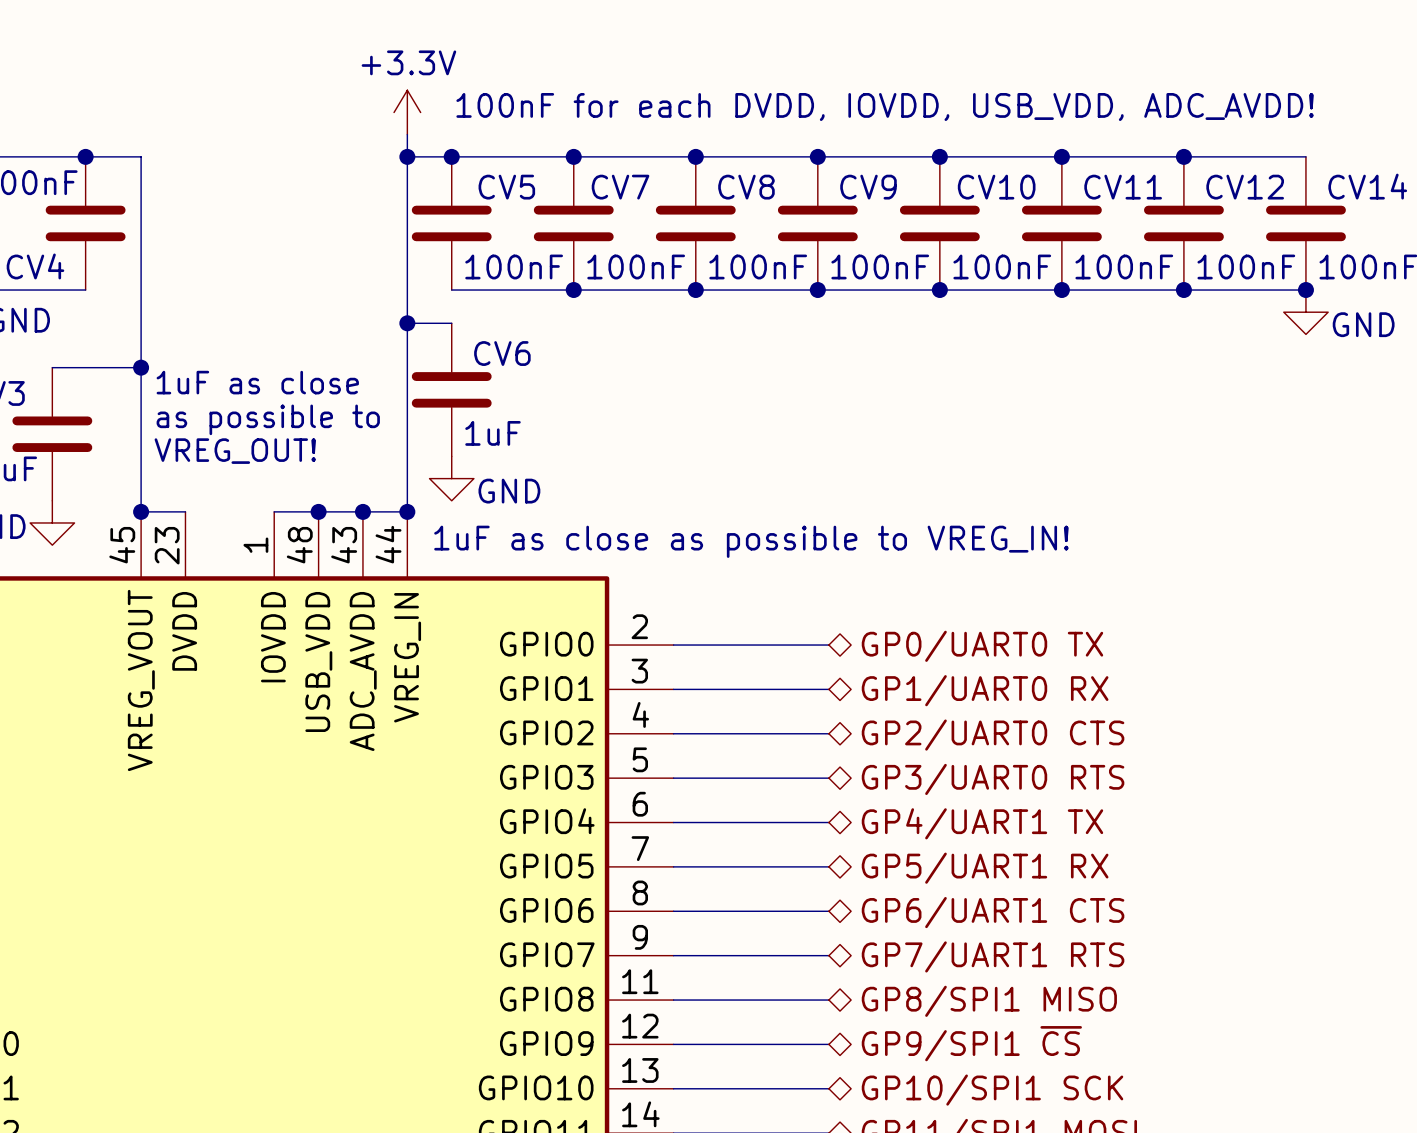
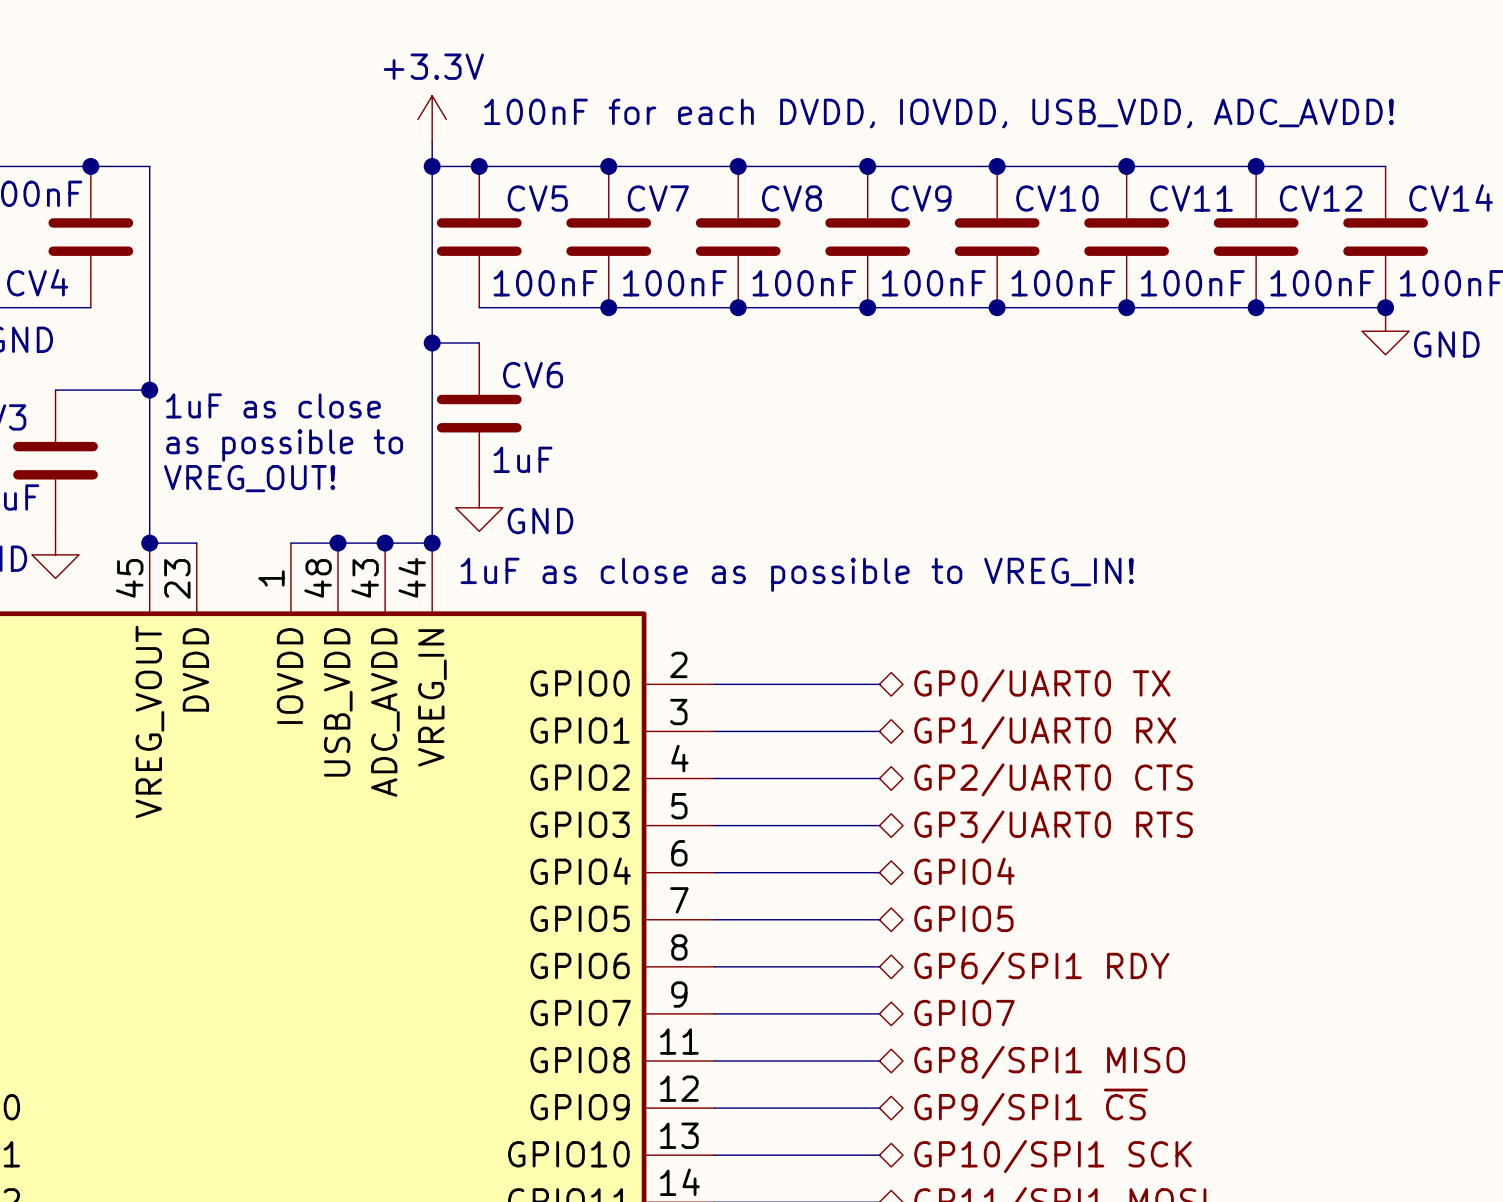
hierarchical label: GP4/UART1 TX (982, 823) -> GPIO4 (964, 871)
hierarchical label: GP5/UART1 RX (985, 868) -> GPIO5 (963, 918)
hierarchical label: GP6/UART1 CTS (993, 912) -> GP6/SPI1 RDY (1041, 968)
hierarchical label: GP7/UART1 RTS (993, 956) -> GPIO7 (964, 1013)

